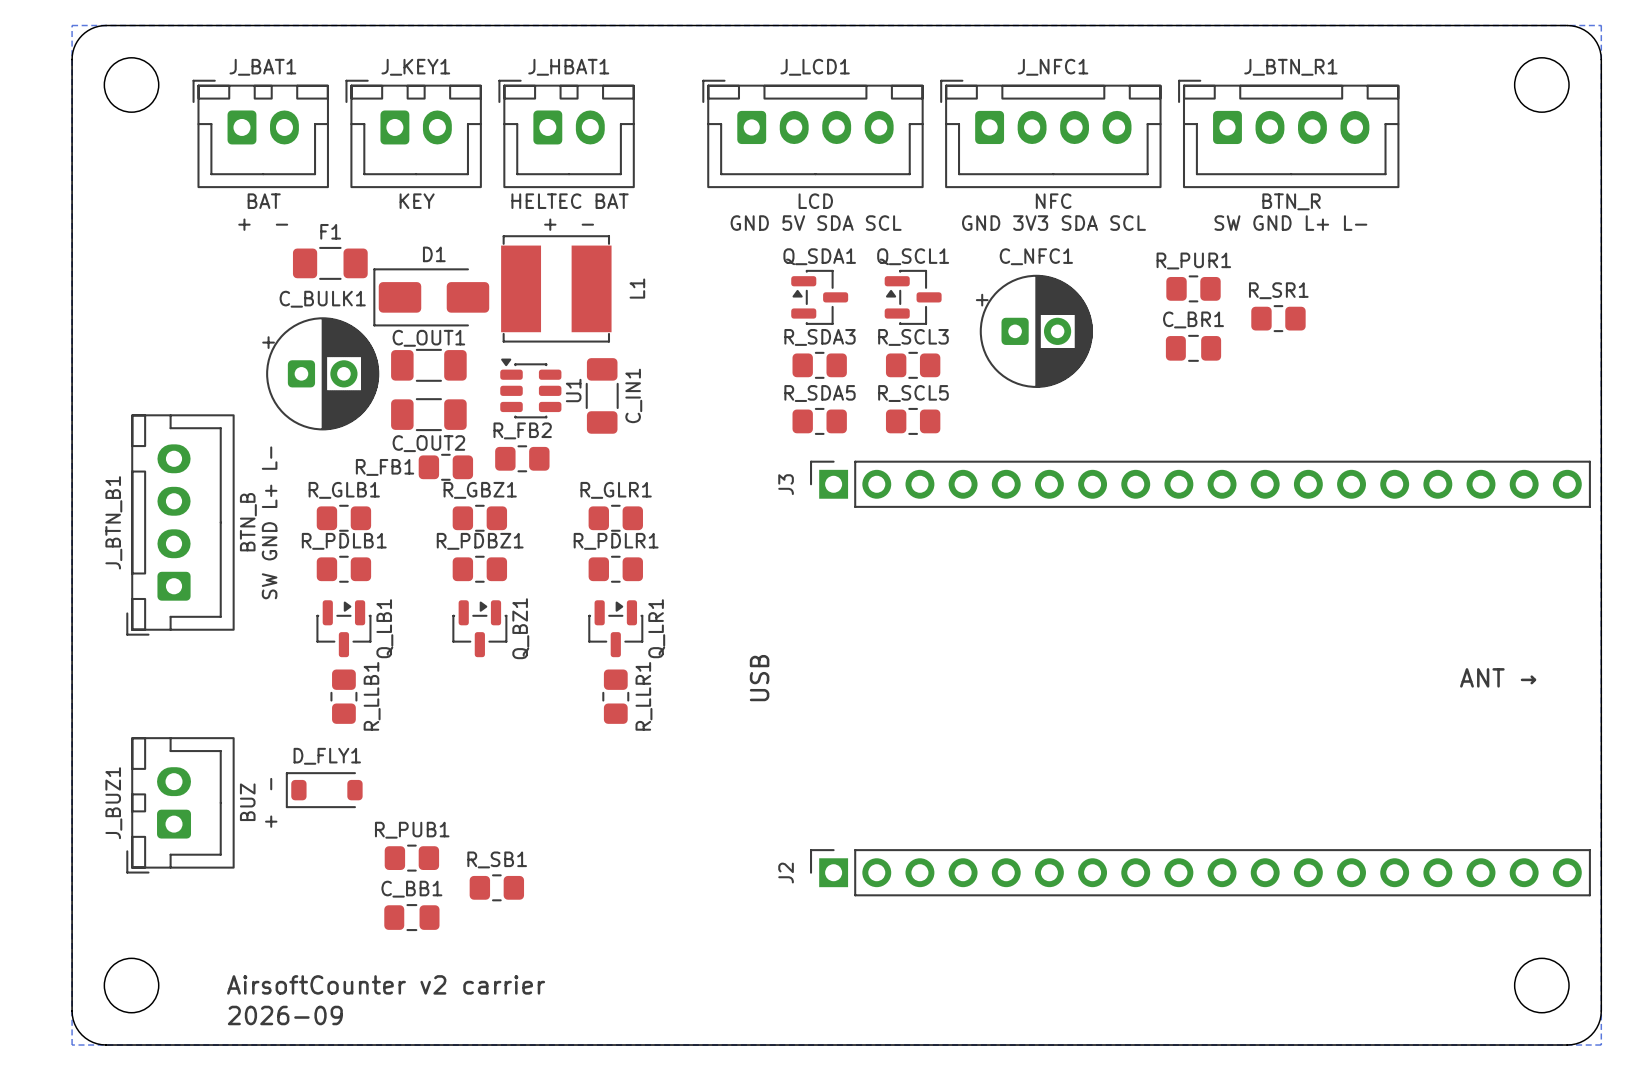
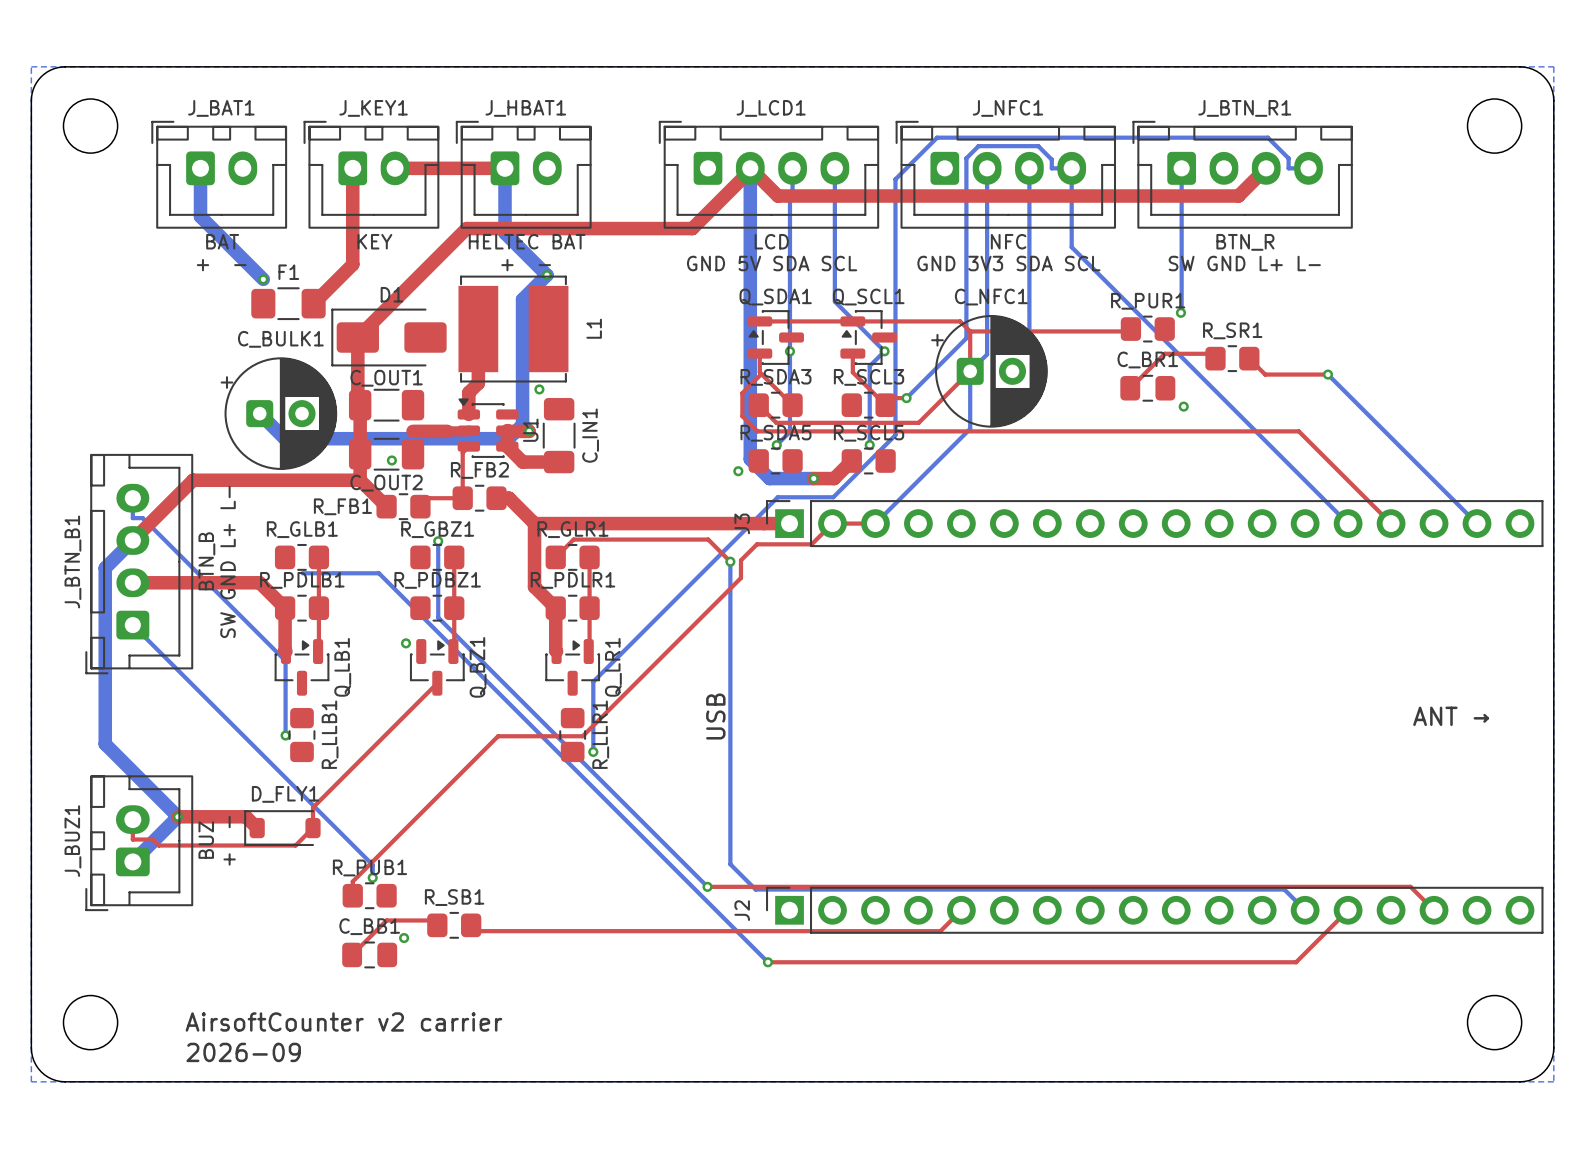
bottom track: none -> (200, 168) (200, 216) (263, 279)
top track: none -> (352, 168) (352, 264) (313, 303)
top track: none -> (395, 168) (505, 168)
bottom track: none -> (505, 168) (505, 233) (546, 275) (522, 299) (522, 424)
top track: none -> (750, 168) (777, 196) (1238, 196) (1266, 168)
bottom track: none -> (750, 168) (750, 459) (769, 478) (813, 478)
bottom track: none -> (792, 168) (792, 190) (789, 192) (789, 431) (776, 445)
bottom track: none -> (834, 168) (834, 301) (884, 351) (869, 366) (869, 445)
bottom track: none -> (987, 168) (987, 354) (970, 371) (970, 428) (875, 523)
bottom track: none -> (1029, 168) (1029, 332) (1016, 345)
bottom track: none -> (1181, 168) (1180, 312)
bottom track: none -> (1308, 168) (1288, 168) (1288, 158) (1267, 137) (937, 137) (895, 179) (895, 435) (833, 497) (777, 497) (593, 681) (593, 751)
top track: none -> (751, 169) (692, 228) (466, 228) (357, 337) (360, 480)
via: none -> (546, 275)
via: none -> (263, 279)
via: none -> (1180, 312)
top track: none -> (759, 321) (960, 321) (970, 331)
top track: none -> (478, 329) (478, 383) (468, 392) (468, 414)
top track: none -> (1130, 329) (1128, 331) (970, 331)
top track: none -> (970, 331) (970, 371) (918, 422) (776, 422) (758, 405)
via: none -> (789, 351)
via: none -> (884, 351)
top track: none -> (759, 353) (759, 372) (761, 374)
top track: none -> (852, 353) (852, 372) (885, 405) (892, 398) (906, 398)
top track: none -> (1215, 358) (1210, 353) (1164, 353) (1130, 388)
top track: none -> (1249, 358) (1265, 374) (1327, 374)
top track: none -> (761, 374) (742, 393) (742, 416) (757, 431) (1298, 431) (1391, 523)
top track: none -> (761, 374) (792, 405)
bottom track: none -> (1327, 374) (1477, 523)
via: none -> (1327, 374)
via: none -> (539, 389)
bottom track: none -> (906, 398) (966, 338) (966, 158) (978, 146) (1038, 146) (1051, 159) (1051, 168) (1071, 168) (1071, 247) (1348, 523)
via: none -> (906, 398)
via: none -> (1183, 406)
bottom track: none -> (259, 413) (284, 438) (508, 438) (522, 424)
top track: none -> (468, 430) (413, 431)
top track: none -> (529, 431) (507, 430) (507, 446) (522, 462) (559, 462)
via: none -> (529, 431)
via: none -> (776, 445)
via: none -> (869, 445)
top track: none -> (468, 446) (462, 452) (462, 498) (428, 498) (420, 506)
via: none -> (391, 460)
top track: none -> (851, 460) (834, 478) (813, 478)
via: none -> (738, 471)
via: none -> (813, 478)
top track: none -> (360, 480) (193, 480) (132, 540)
top track: none -> (360, 480) (386, 506)
bottom track: none -> (132, 498) (132, 518) (142, 518) (285, 660) (285, 735)
top track: none -> (496, 498) (509, 498) (534, 523)
top track: none -> (534, 523) (534, 586) (555, 608) (556, 651)
top track: none -> (534, 523) (789, 523)
top track: none -> (875, 523) (832, 523) (811, 544) (756, 544) (740, 560) (740, 578) (582, 736) (498, 736) (352, 881) (352, 895)
bottom track: none -> (132, 540) (105, 568) (105, 744) (177, 816) (132, 861)
bottom track: none -> (438, 541) (438, 617) (707, 886)
via: none -> (438, 541)
top track: none -> (318, 557) (318, 651)
top track: none -> (454, 557) (453, 651)
top track: none -> (555, 557) (573, 539) (708, 539) (730, 561)
top track: none -> (589, 557) (588, 651)
bottom track: none -> (730, 561) (730, 864) (755, 889) (1284, 889) (1305, 910)
via: none -> (730, 561)
bottom track: none -> (302, 573) (378, 573) (767, 962)
top track: none -> (132, 582) (259, 582) (285, 608) (285, 651)
bottom track: none -> (132, 625) (372, 864) (372, 877)
via: none -> (405, 643)
top track: none -> (437, 683) (313, 807) (313, 828) (295, 845) (158, 845) (152, 839) (132, 839) (132, 819)
via: none -> (285, 735)
via: none -> (593, 751)
top track: none -> (177, 816) (245, 816) (257, 828)
via: none -> (177, 816)
via: none -> (372, 877)
top track: none -> (707, 886) (1410, 886) (1434, 910)
via: none -> (707, 886)
top track: none -> (961, 910) (940, 931) (476, 931) (471, 925)
top track: none -> (1348, 910) (1296, 962) (767, 962)
top track: none -> (437, 925) (432, 920) (386, 920) (352, 954)
via: none -> (404, 938)
via: none -> (767, 962)

